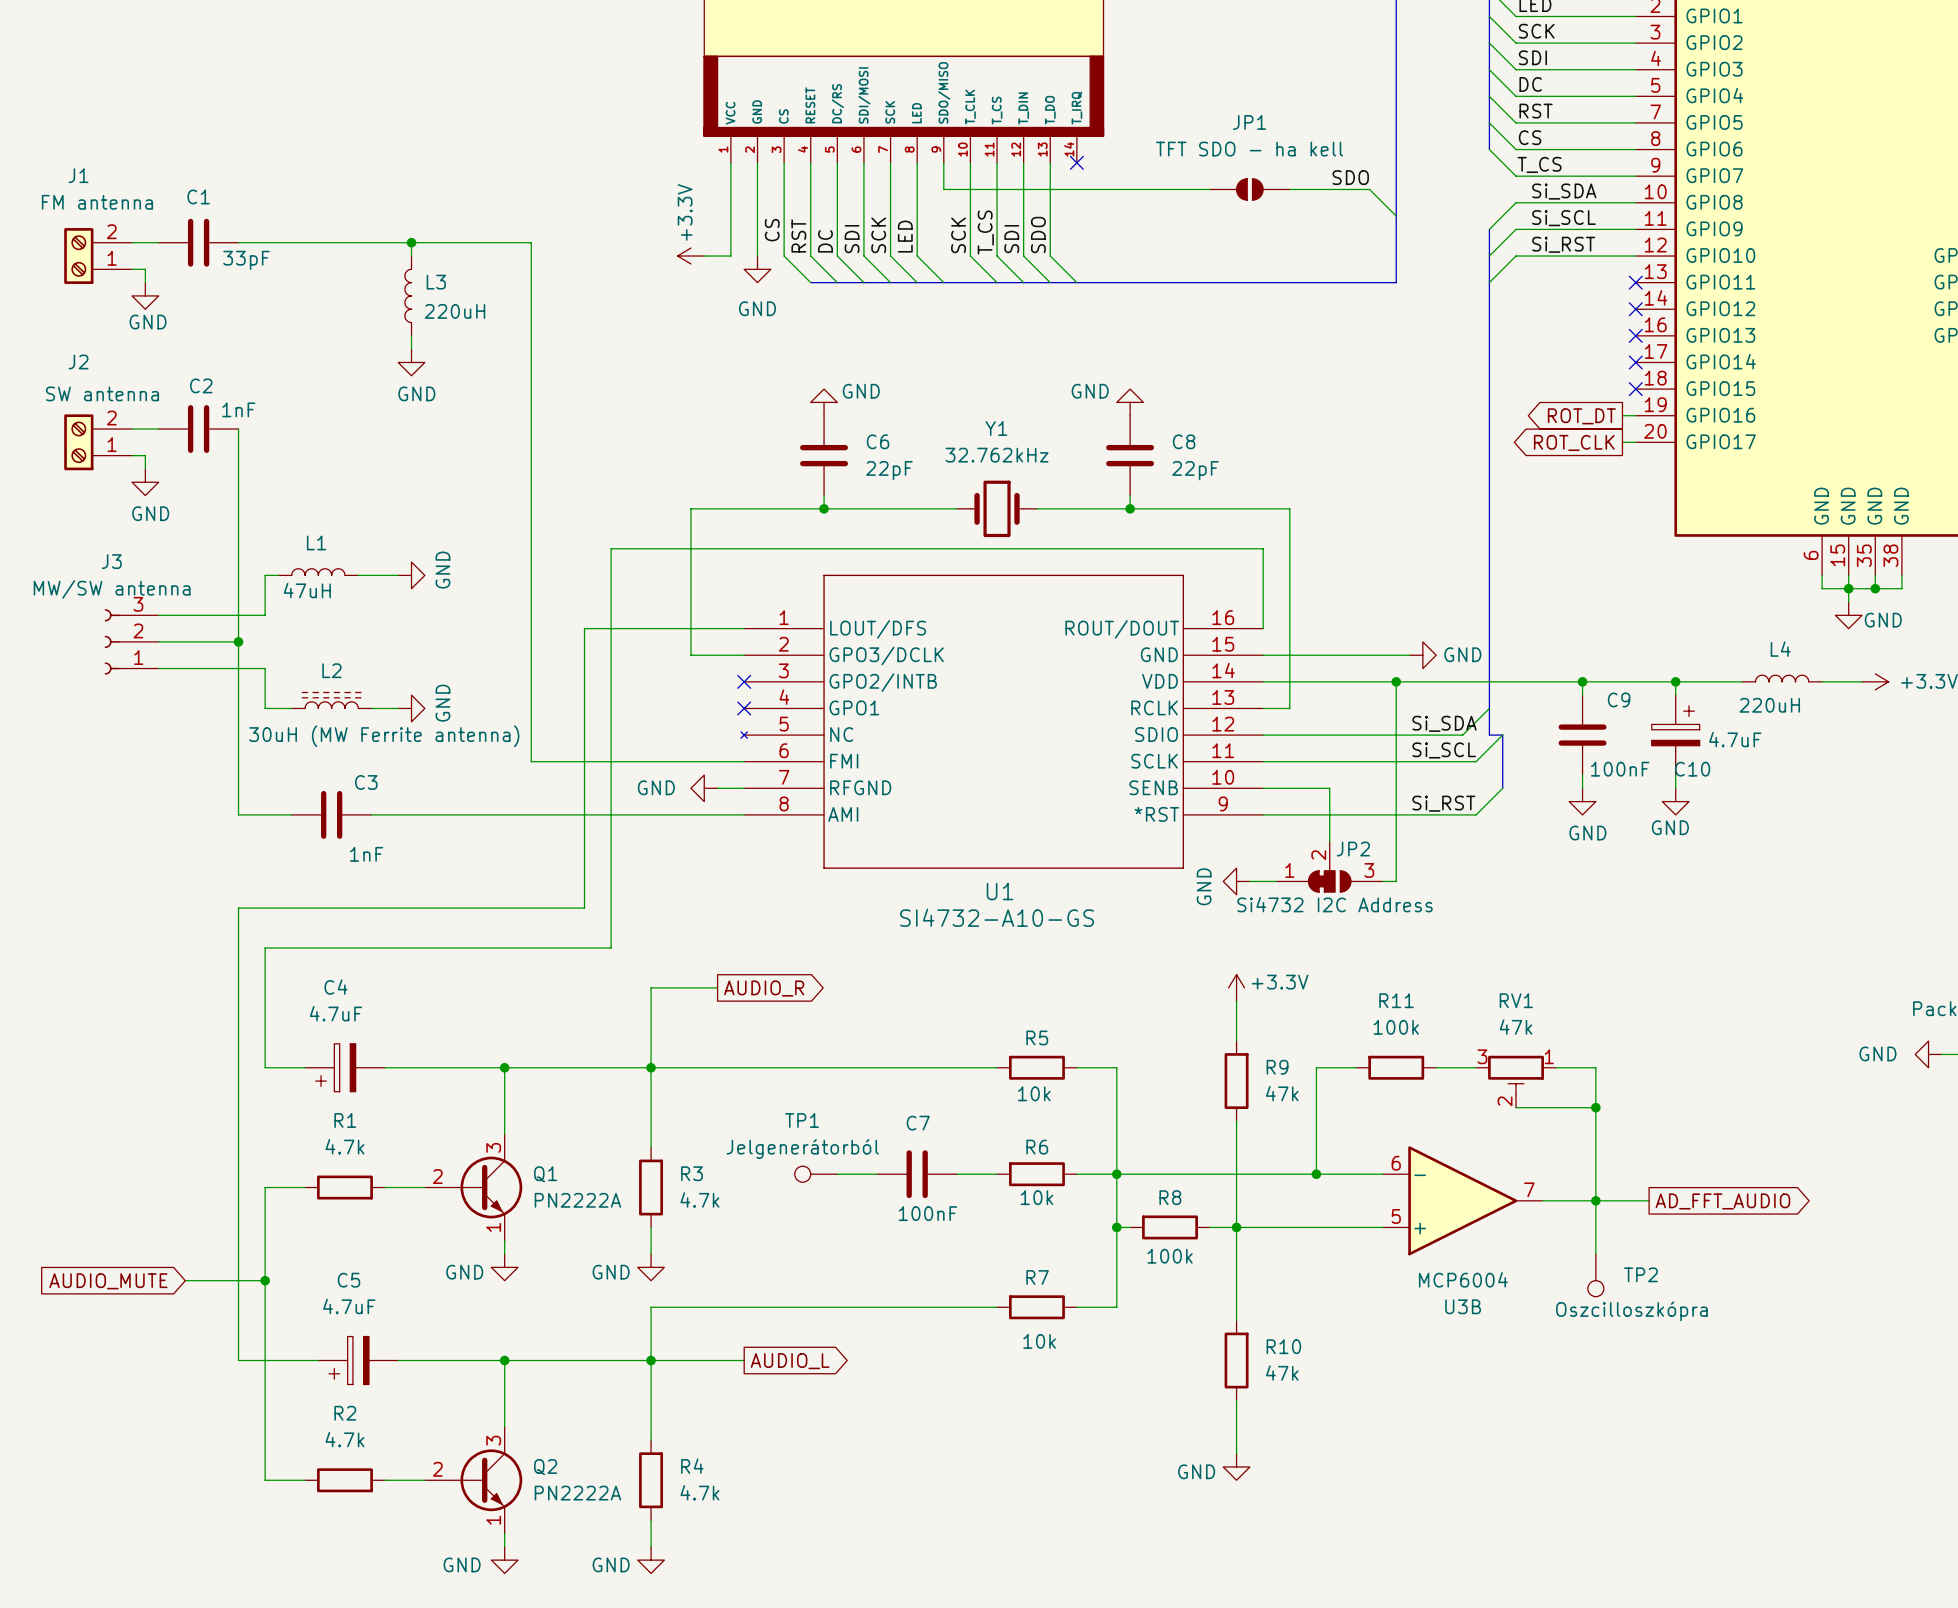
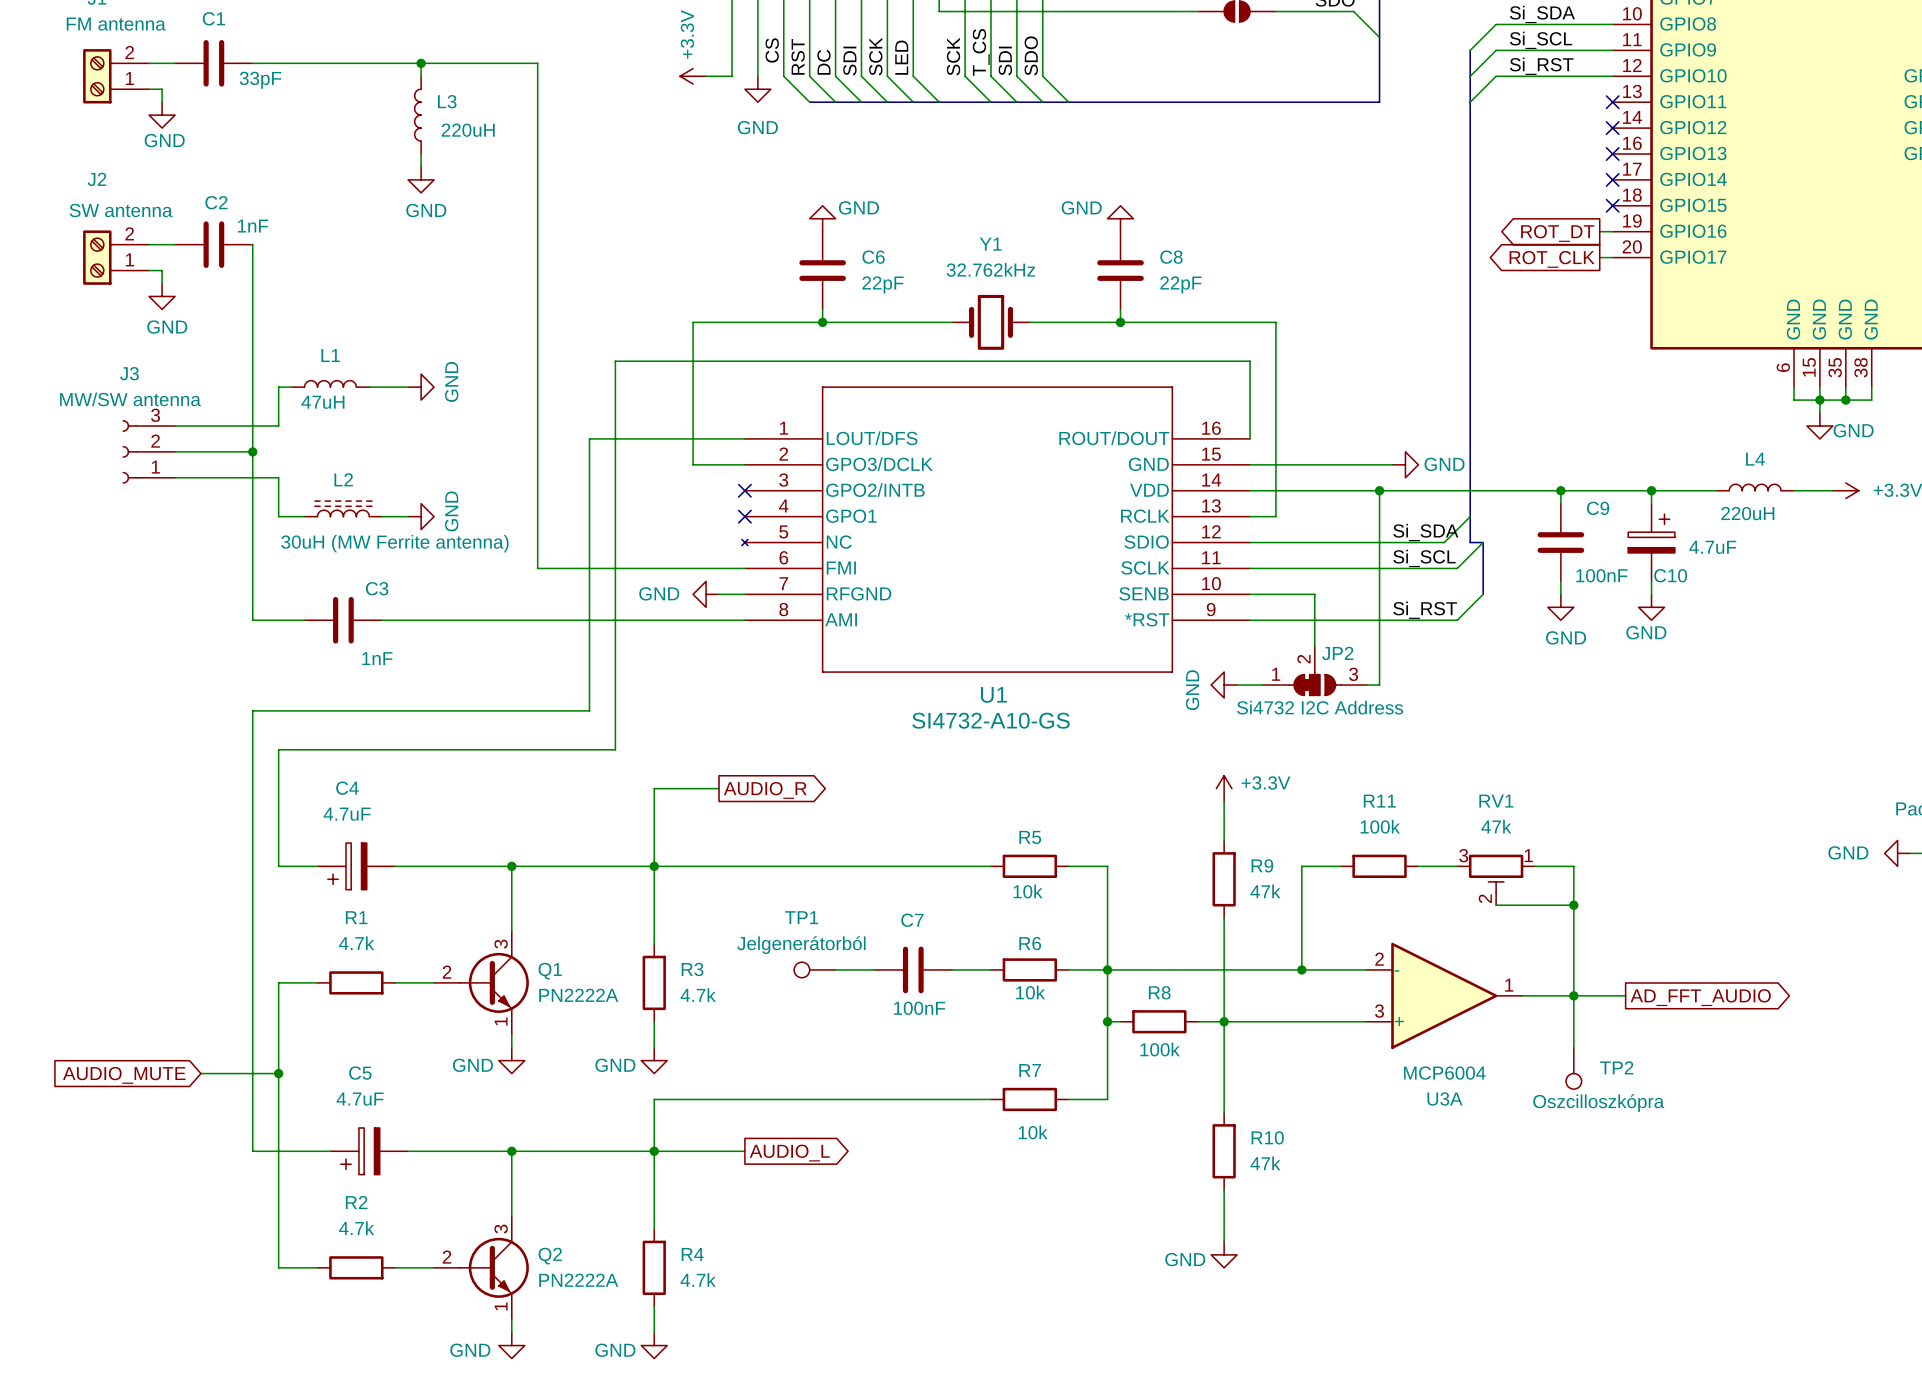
U3B pin number: 6 (1396, 1163) -> 2 (1379, 959)
U3B pin number: 7 (1529, 1189) -> 1 (1509, 985)
U3B pin number: 5 (1396, 1216) -> 3 (1379, 1011)
U3B name: U3B (1463, 1306) -> U3A (1445, 1098)

